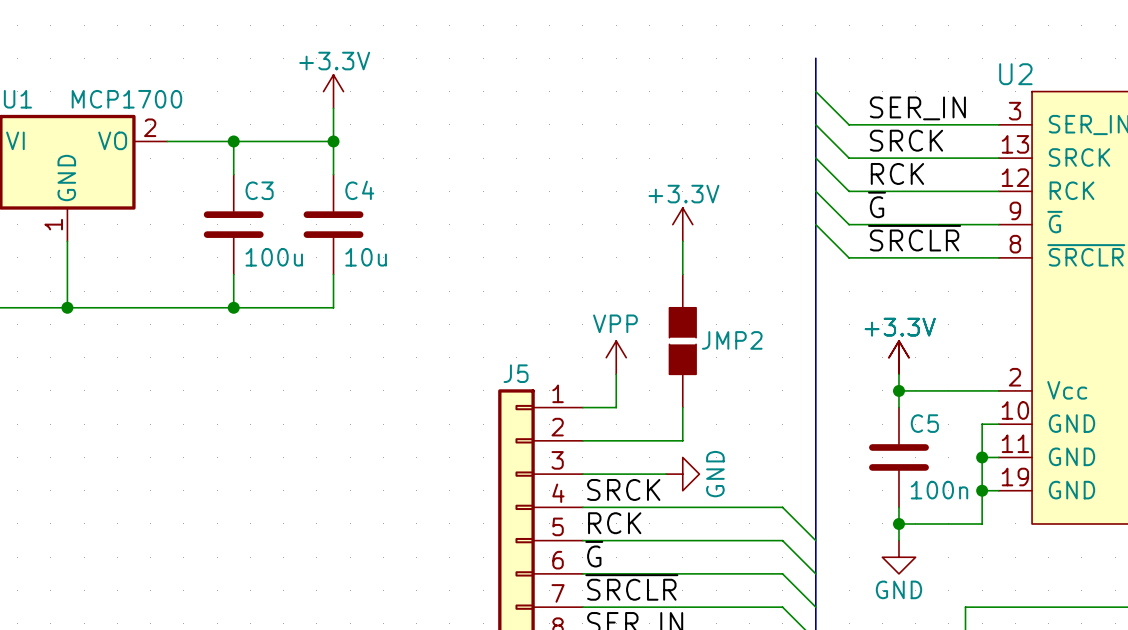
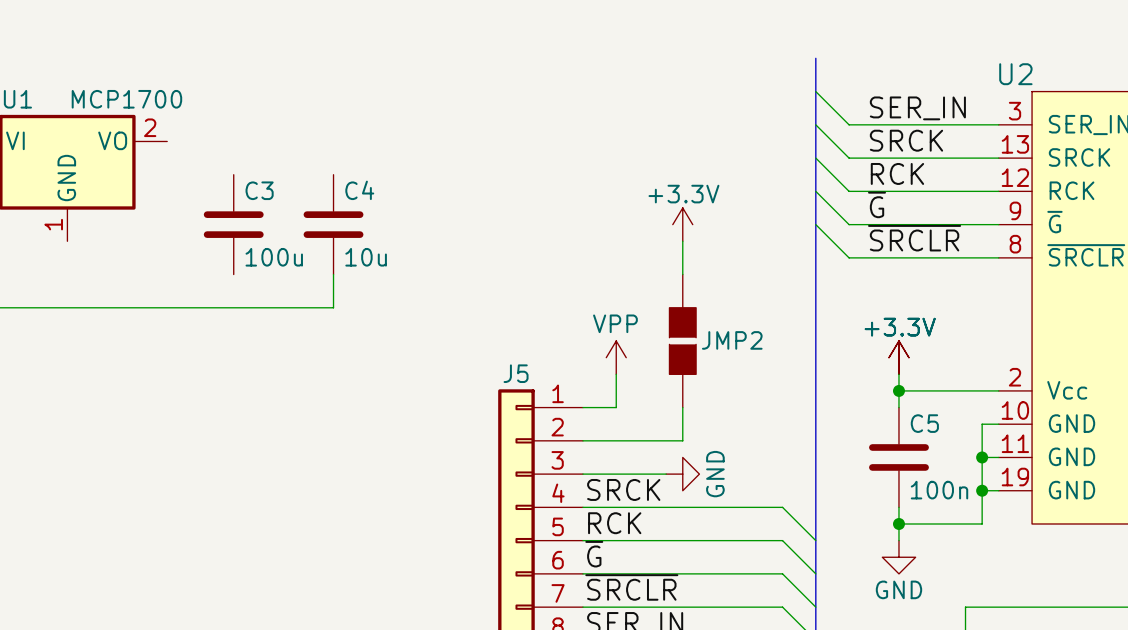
power symbol: +3.3V (333, 91) -> none
wire: (333, 108) (333, 174) -> none
wire: (167, 141) (333, 141) -> none
wire: (233, 141) (233, 174) -> none
junction: (233, 141) -> none
junction: (333, 141) -> none
wire: (67, 241) (67, 307) -> none
wire: (233, 274) (233, 307) -> none
junction: (67, 307) -> none
junction: (233, 307) -> none

